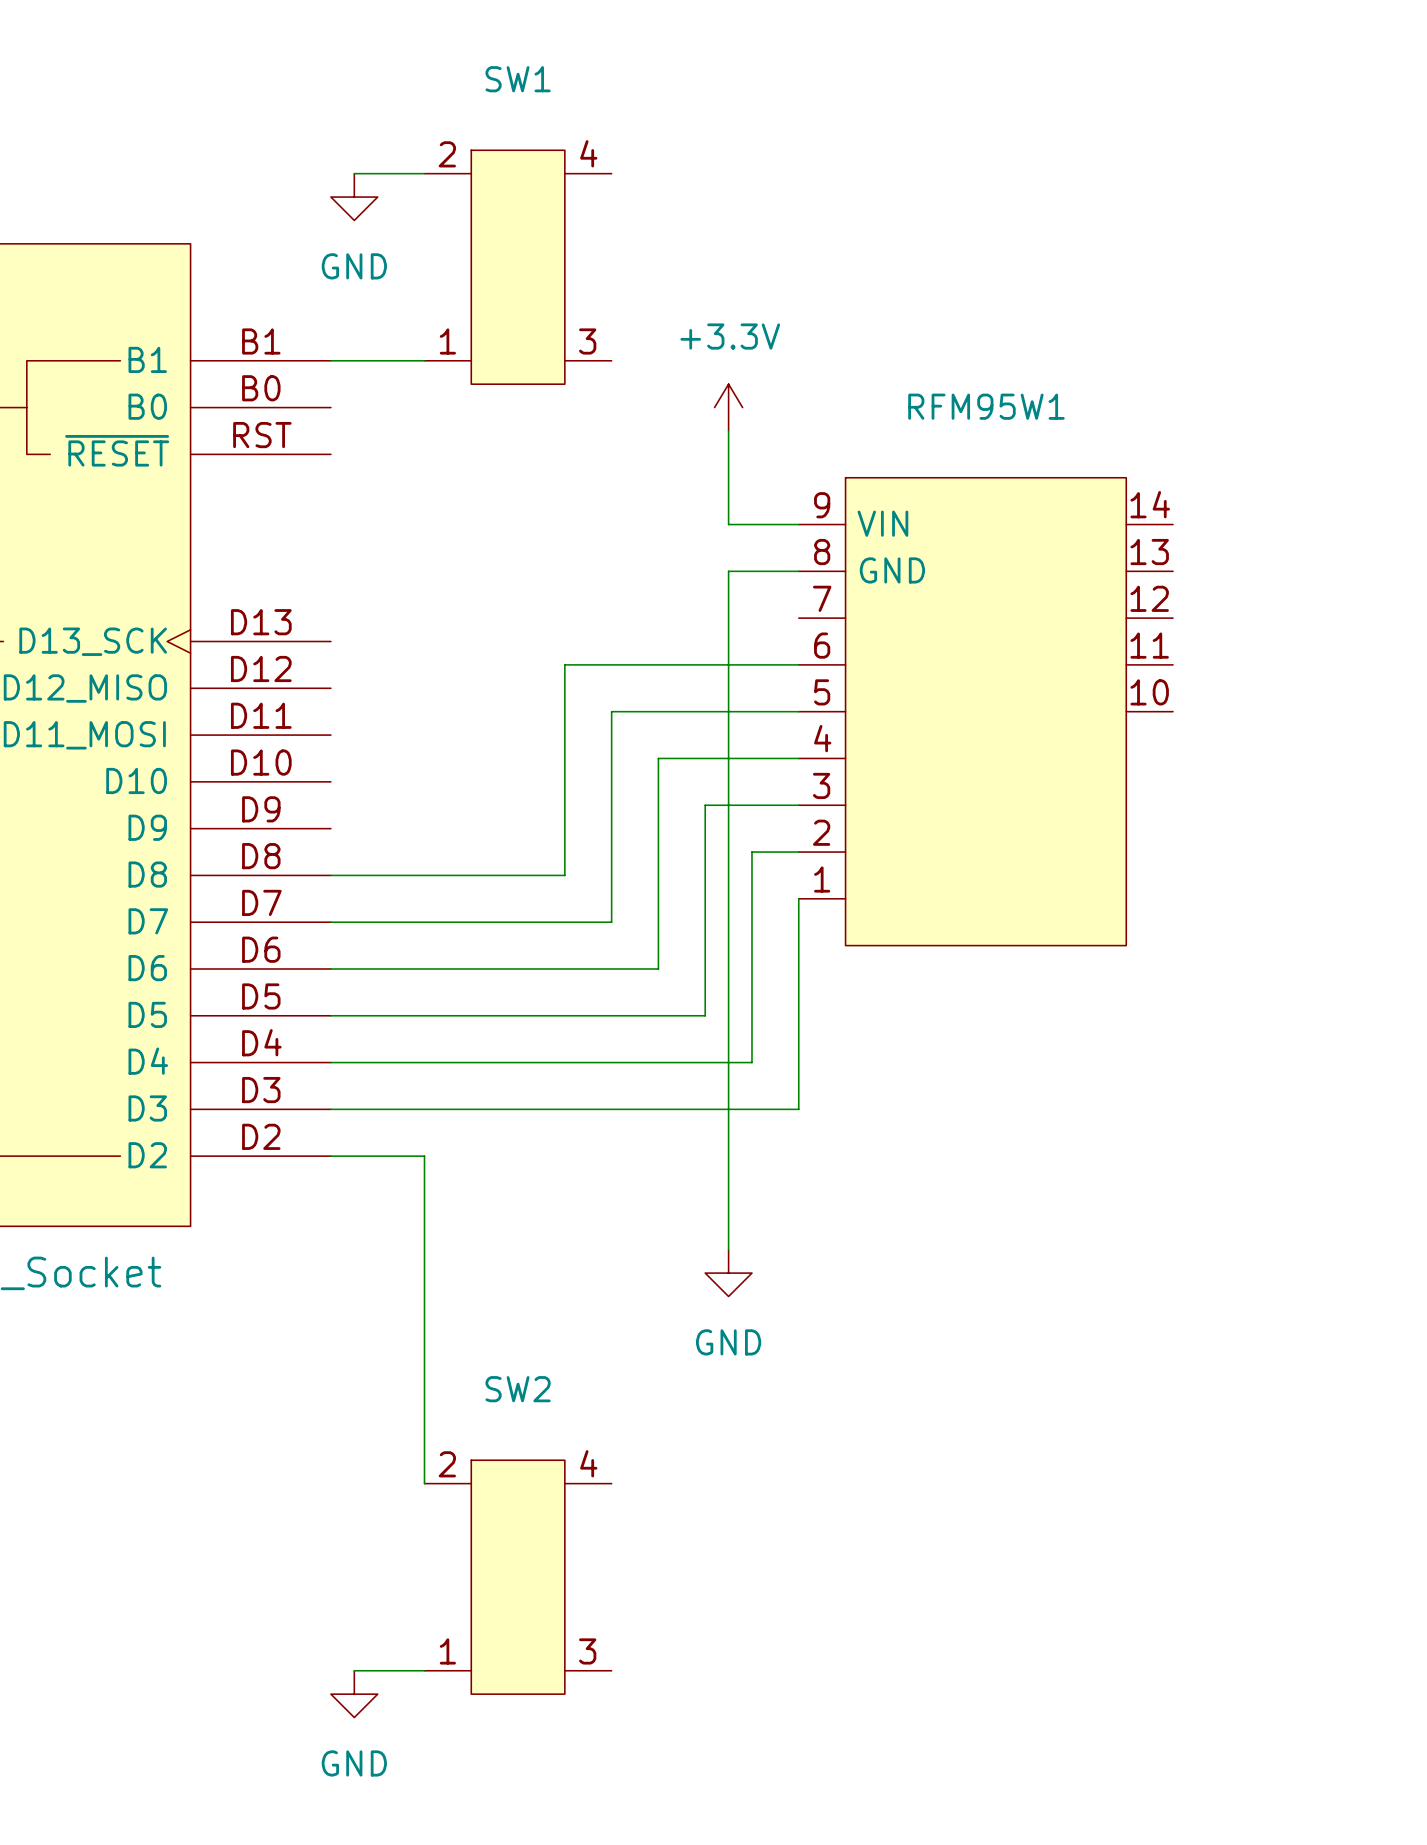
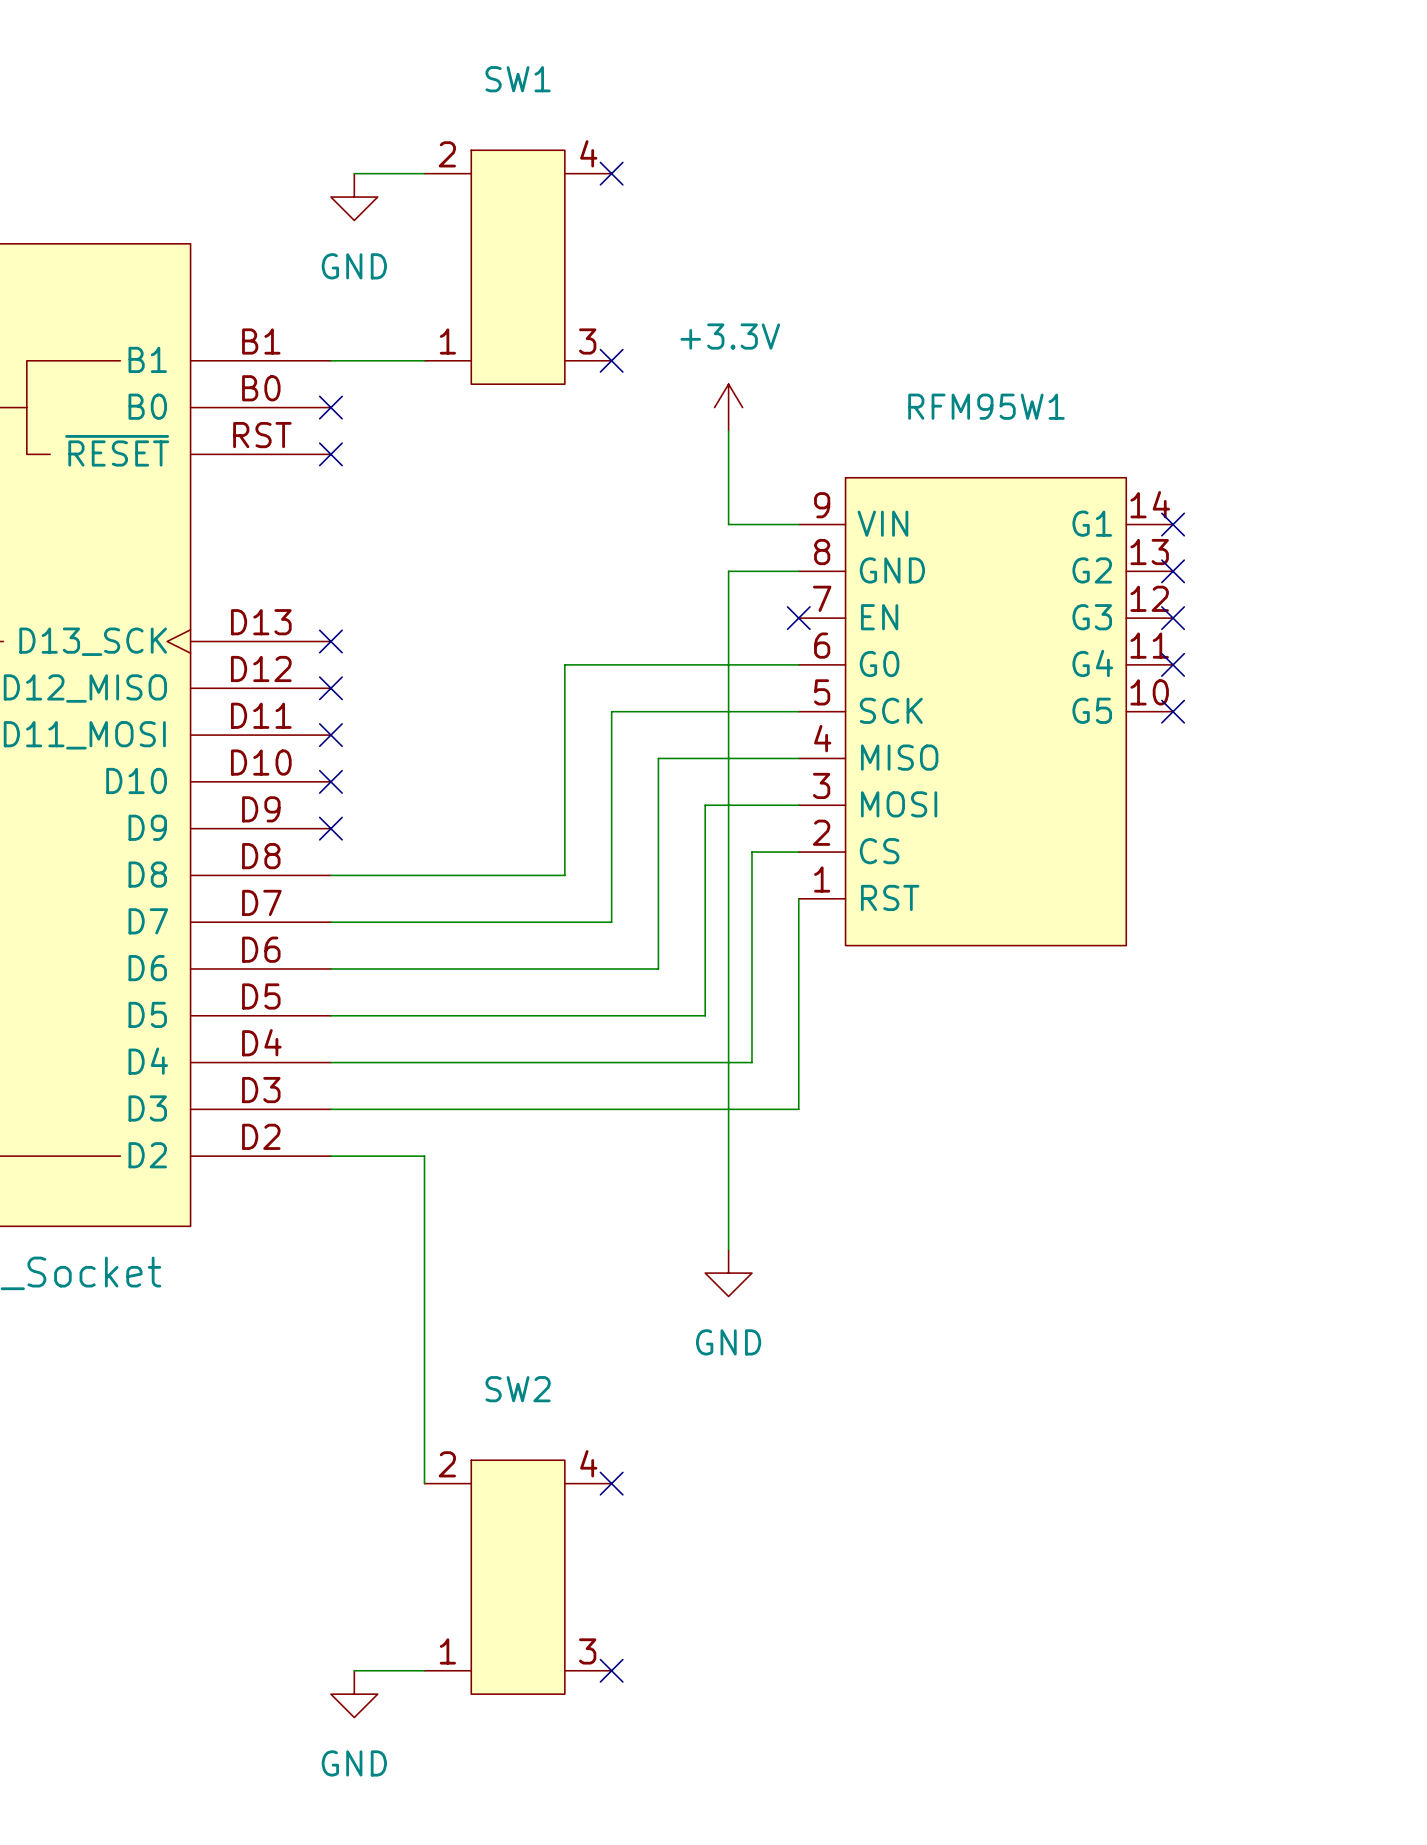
no-connect mark: none -> (611, 173)
no-connect mark: none -> (611, 360)
no-connect mark: none -> (330, 407)
no-connect mark: none -> (330, 454)
RFM95W1 symbol: [798, 477, 1174, 946] -> [798, 477, 1174, 946]
no-connect mark: none -> (1173, 524)
no-connect mark: none -> (1173, 571)
no-connect mark: none -> (798, 618)
no-connect mark: none -> (1173, 618)
no-connect mark: none -> (330, 641)
no-connect mark: none -> (1173, 664)
no-connect mark: none -> (330, 688)
no-connect mark: none -> (1173, 711)
no-connect mark: none -> (330, 735)
no-connect mark: none -> (330, 781)
no-connect mark: none -> (330, 828)
no-connect mark: none -> (611, 1483)
no-connect mark: none -> (611, 1670)

